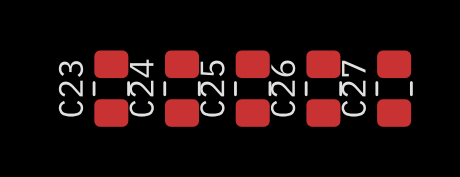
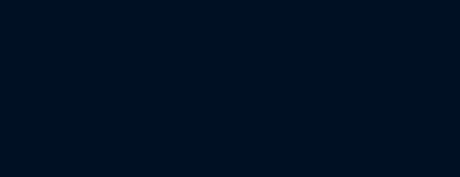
C23: (111, 88) -> none
C24: (182, 88) -> none
C25: (252, 88) -> none
C26: (323, 88) -> none
C27: (394, 88) -> none

